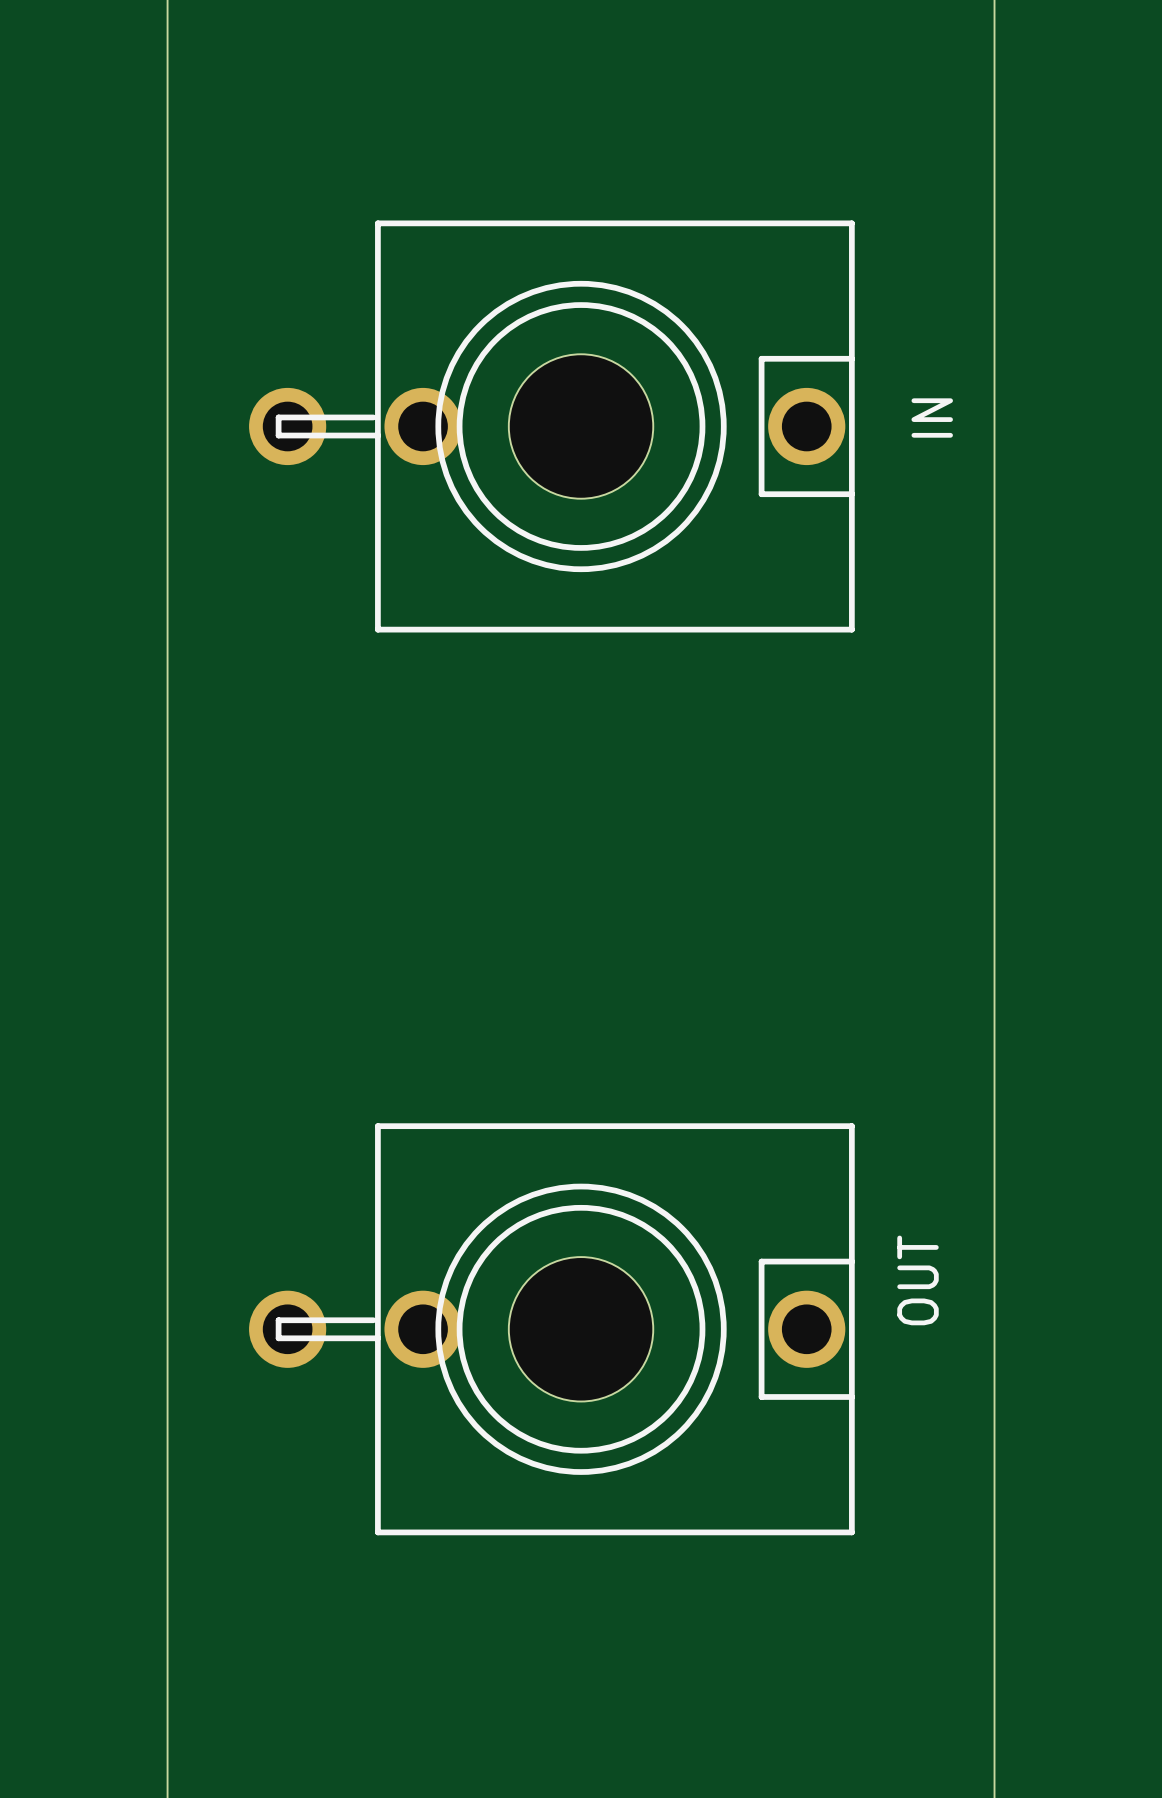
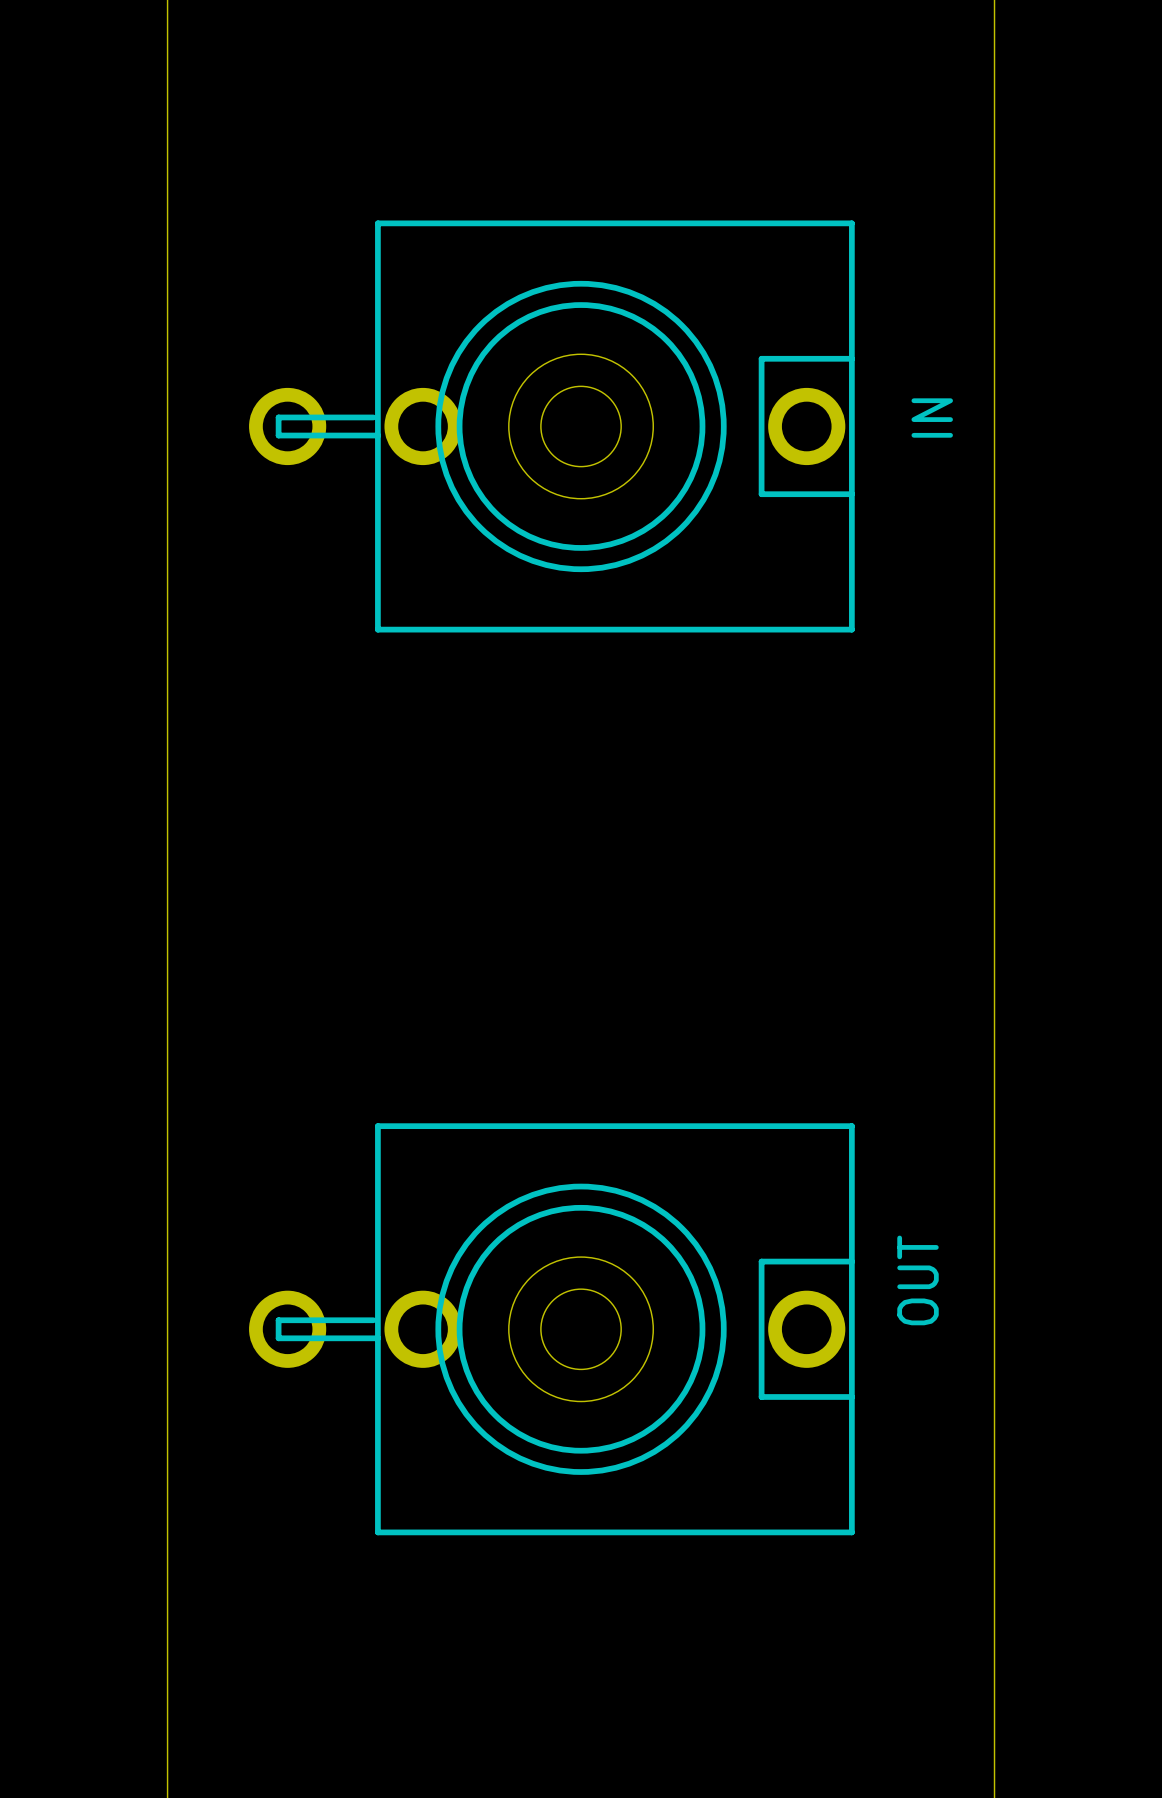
IN footprint: [249, 220, 855, 633] -> [249, 220, 855, 633]
OUT footprint: [249, 1123, 855, 1536] -> [249, 1123, 855, 1536]

